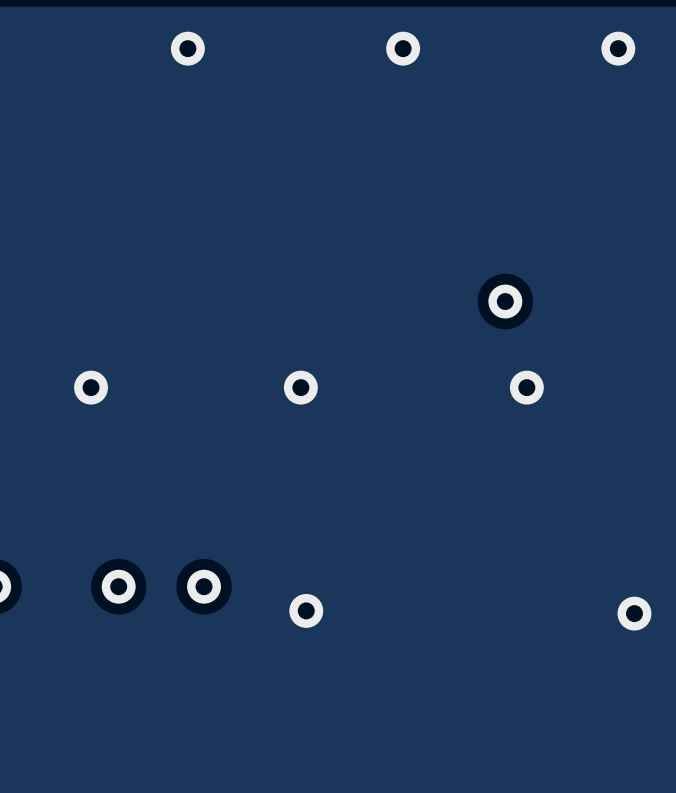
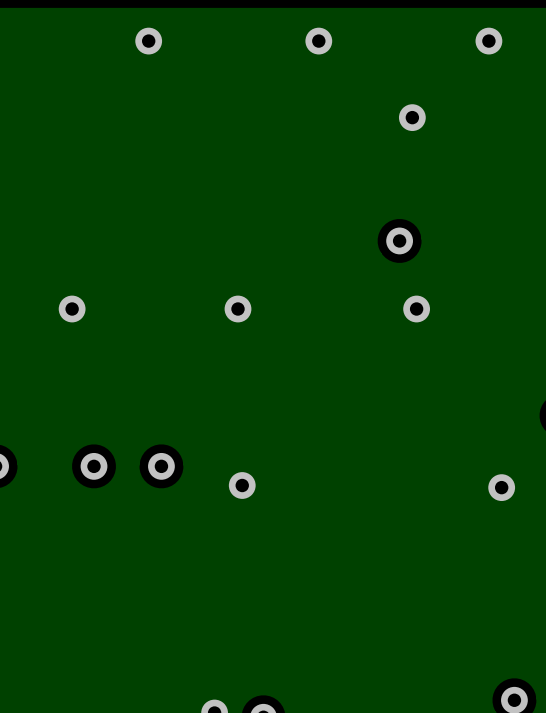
via: none -> (412, 117)

